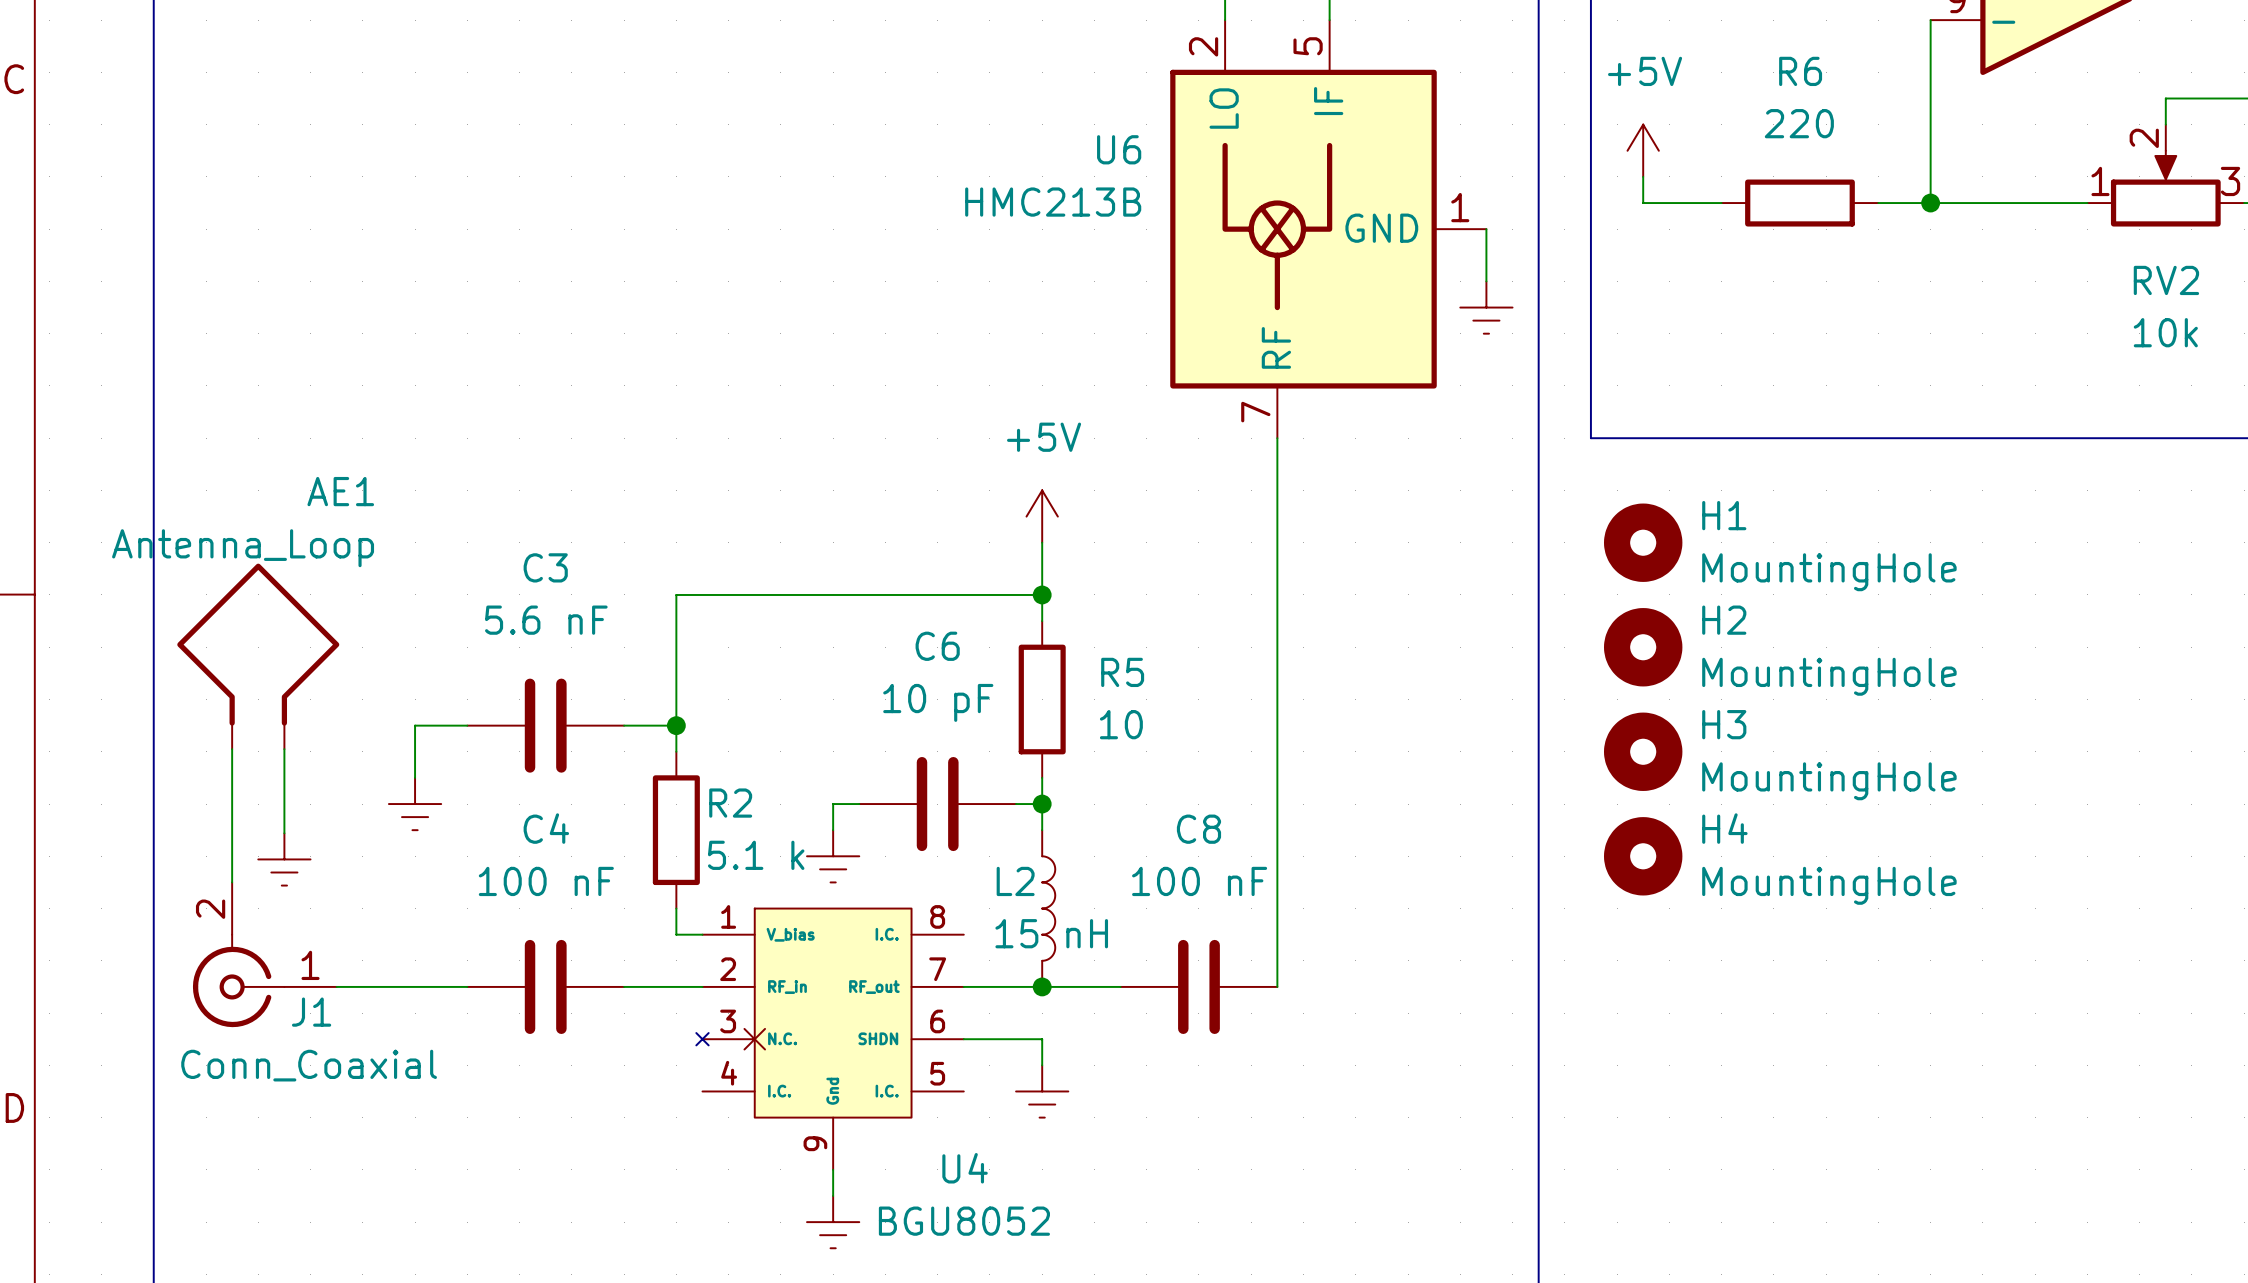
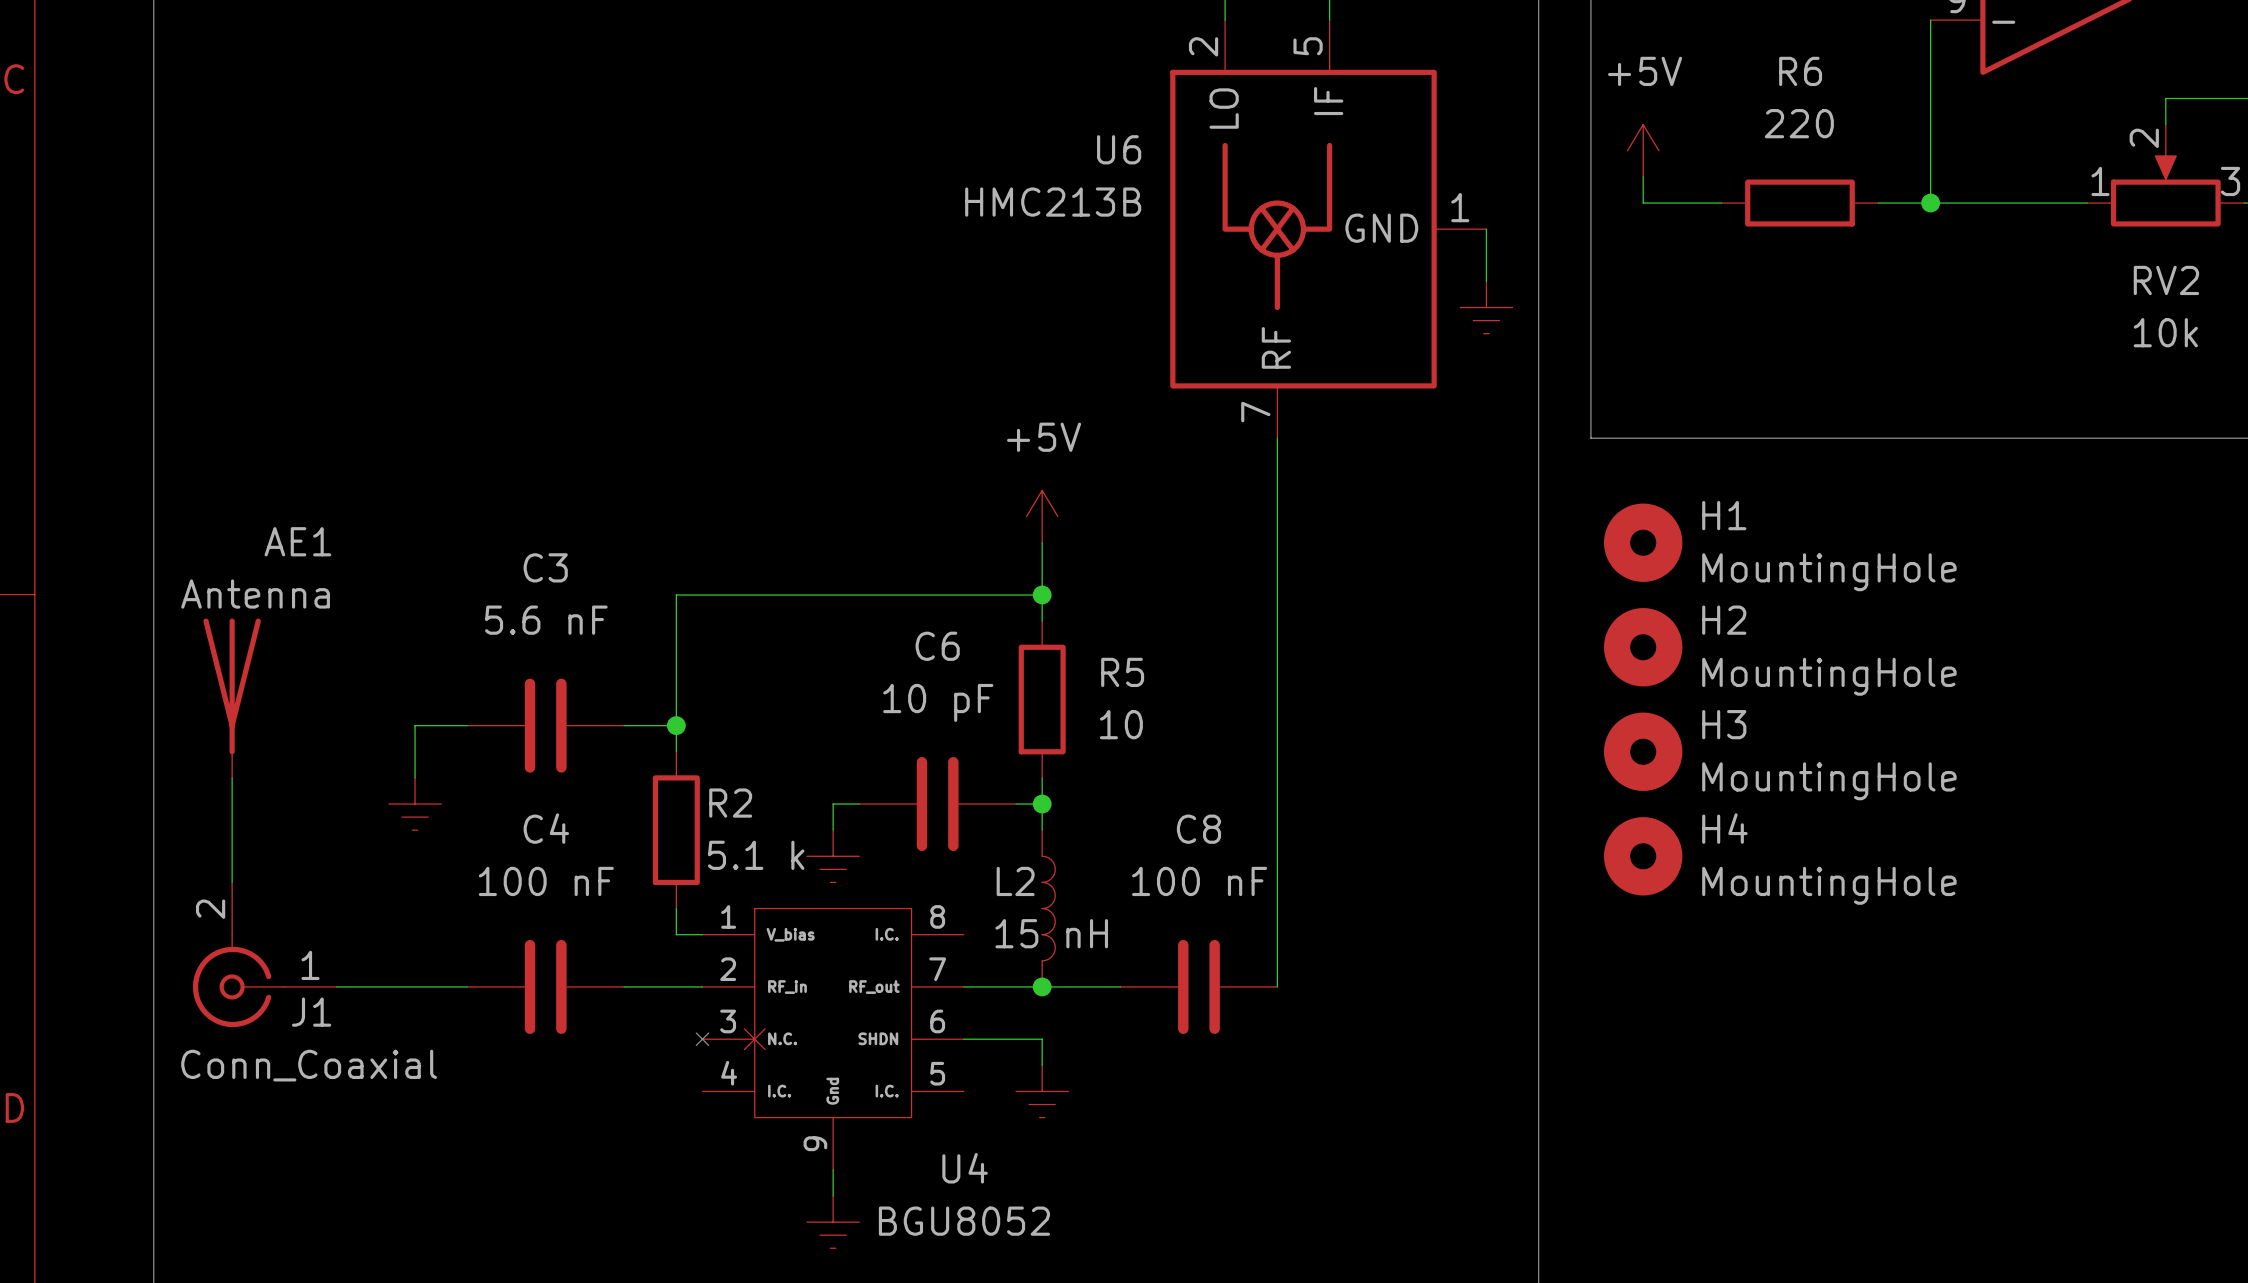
AE1 value: Antenna_Loop (243, 548) -> Antenna (255, 594)
AE1 symbol: [177, 563, 340, 750] -> [203, 618, 261, 778]
wire: (284, 749) (284, 833) -> none
power symbol: (284, 859) -> none

